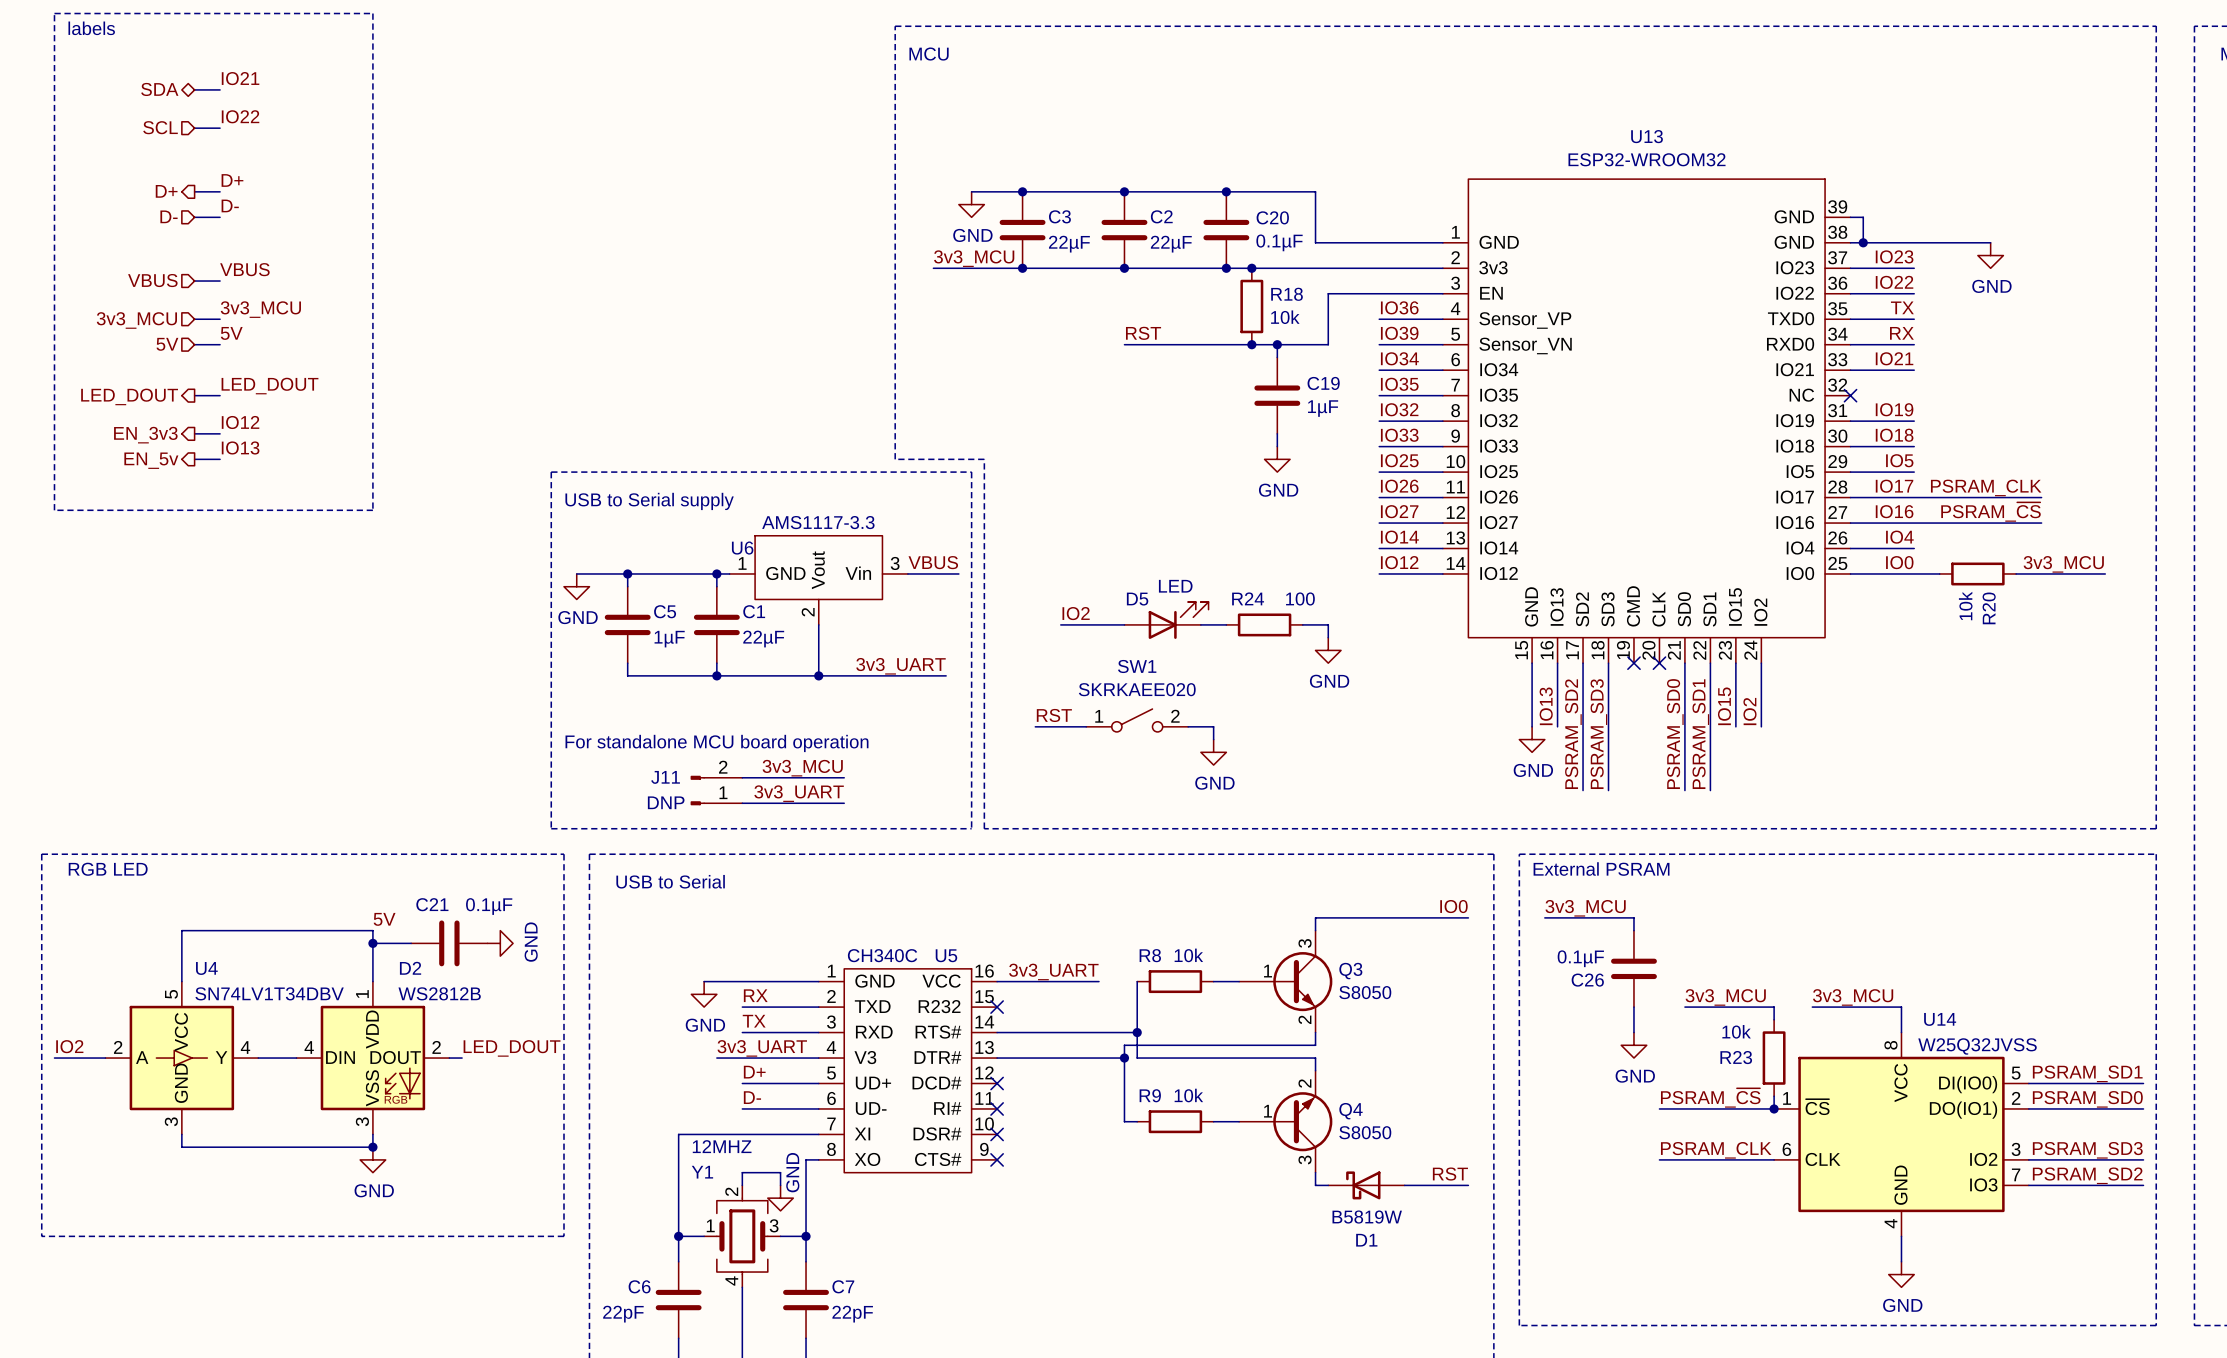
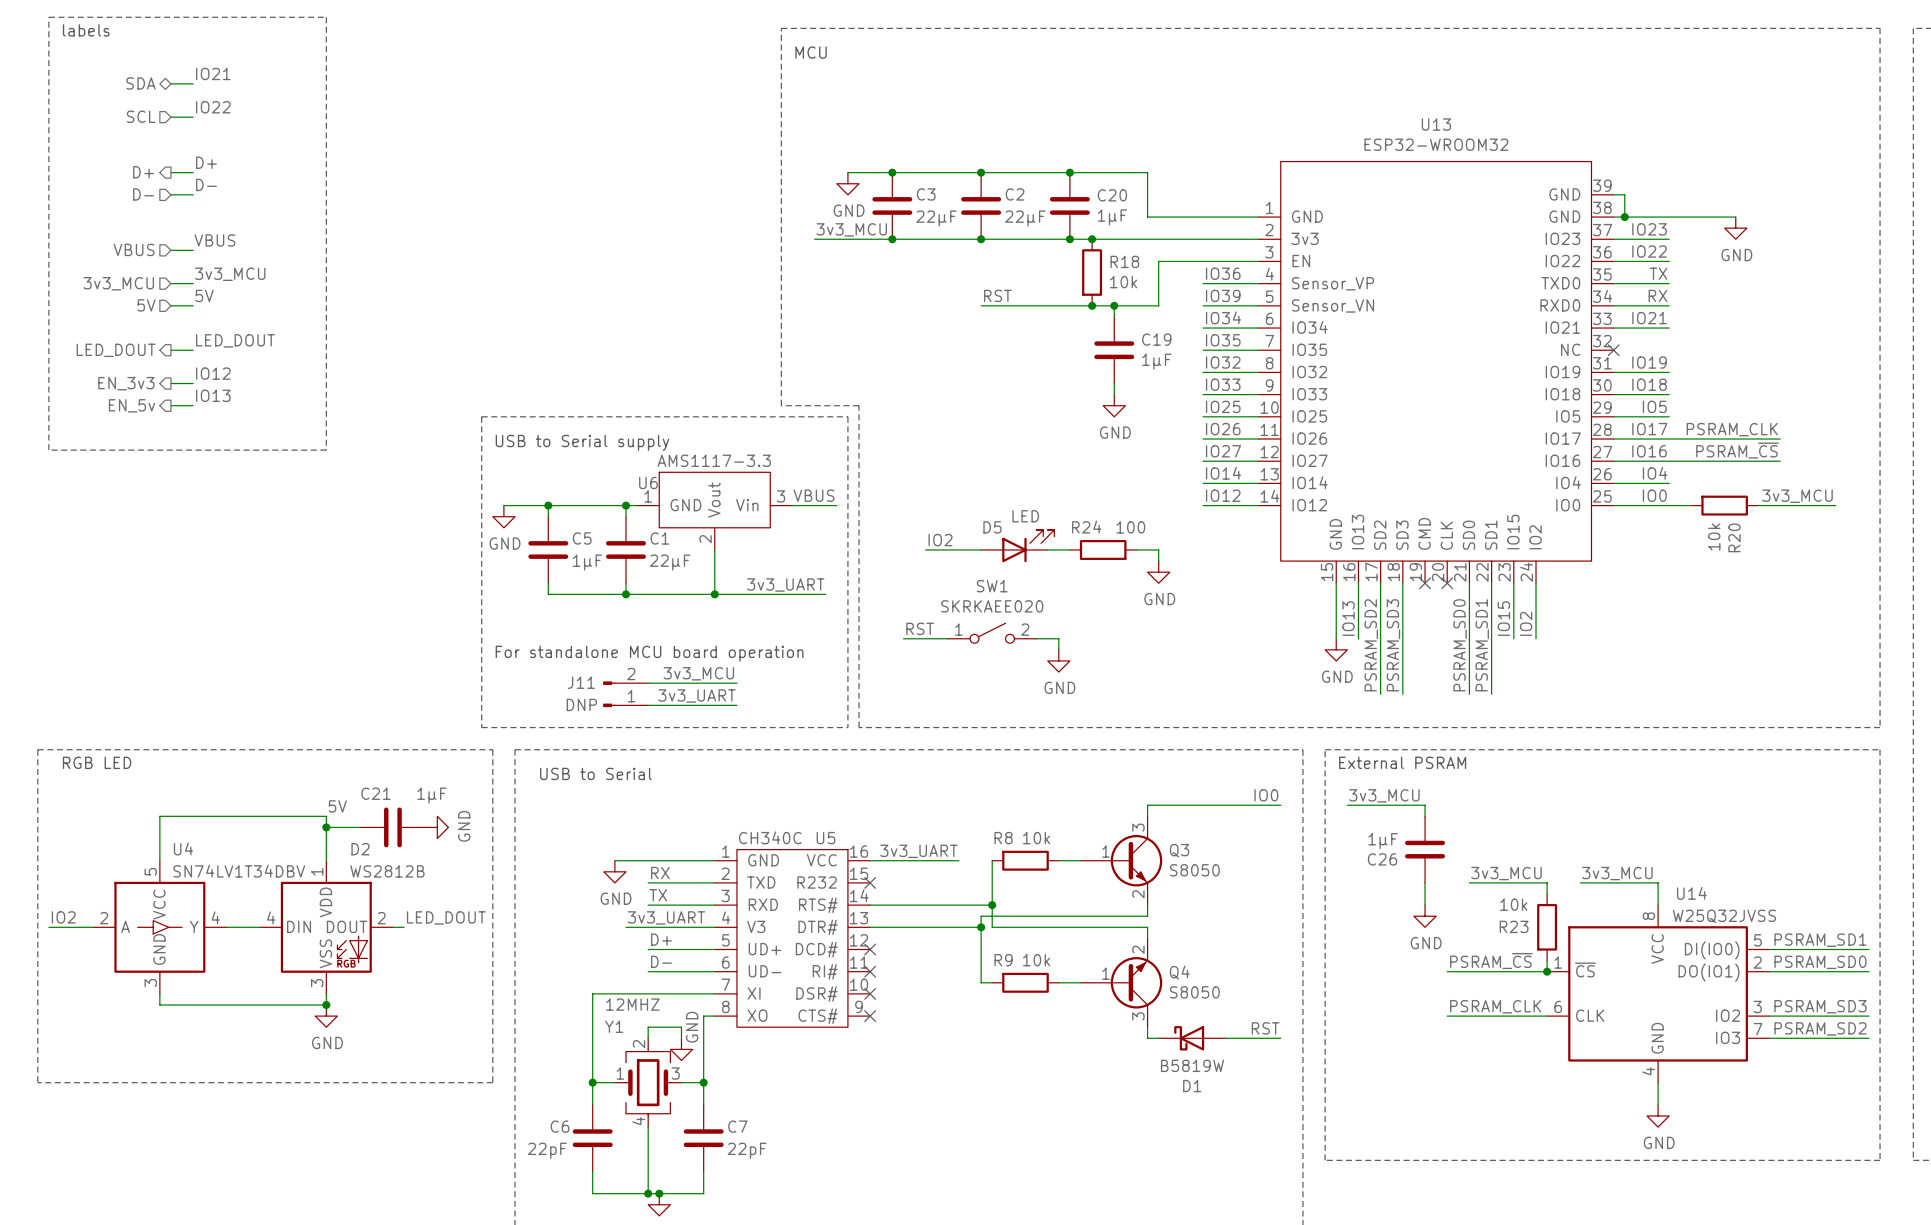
C20 value: 0.1µF (1279, 242) -> 1µF (1112, 217)
C21 value: 0.1µF (489, 906) -> 1µF (431, 795)
C26 value: 0.1µF (1580, 958) -> 1µF (1383, 841)

